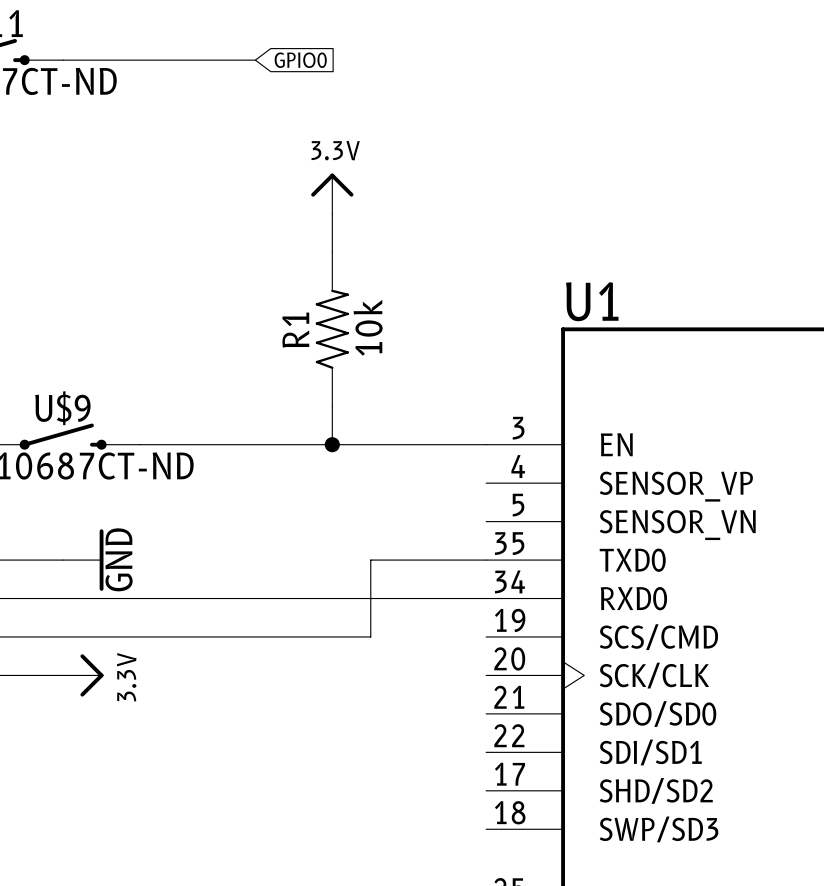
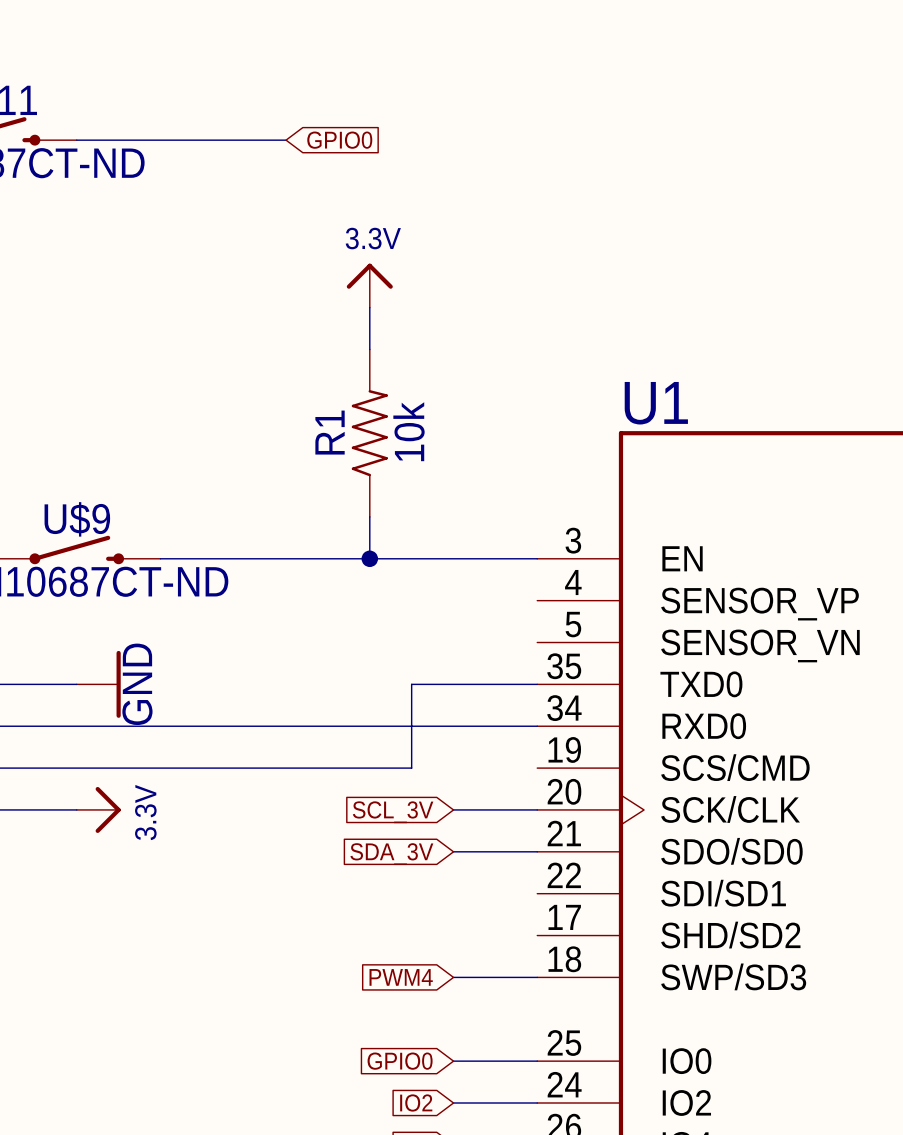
wire: none -> (453, 809) (537, 809)
global label: none -> SCL_3V (393, 812)
wire: none -> (453, 851) (537, 851)
global label: none -> SDA_3V (391, 854)
global label: none -> PWM4 (401, 977)
wire: none -> (453, 977) (537, 977)

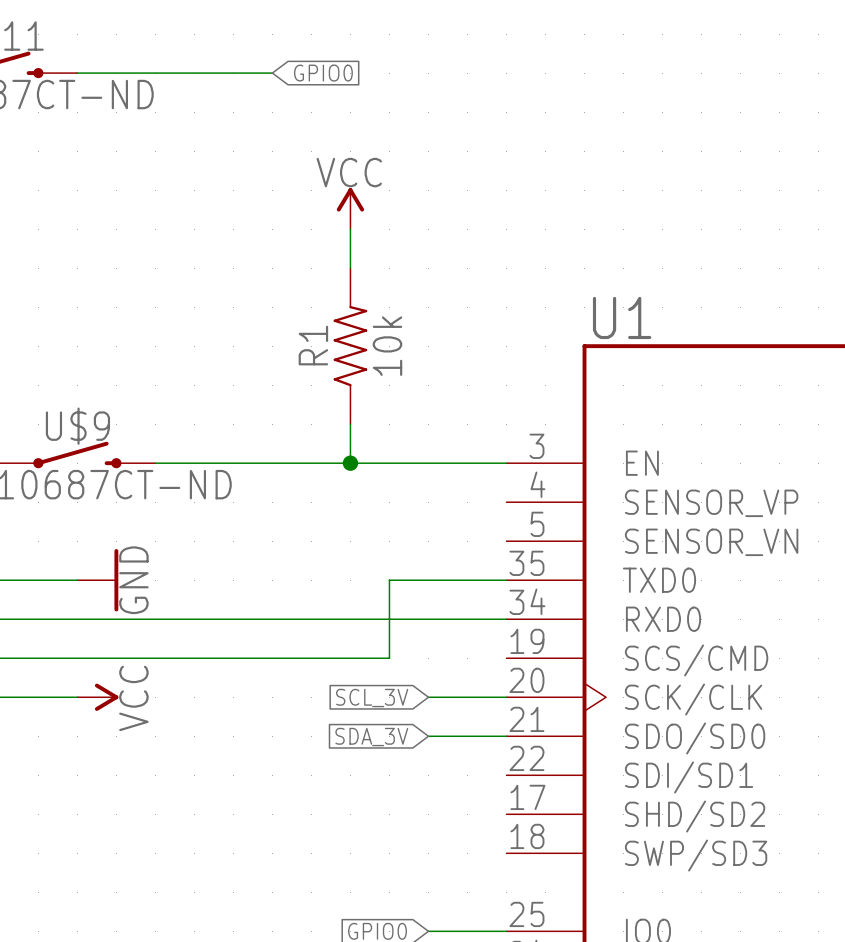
power symbol: 3.3V (369, 285) -> VCC (350, 208)
power symbol: 3.3V (98, 809) -> VCC (97, 697)
global label: PWM4 (401, 977) -> none
wire: (453, 977) (537, 977) -> none

